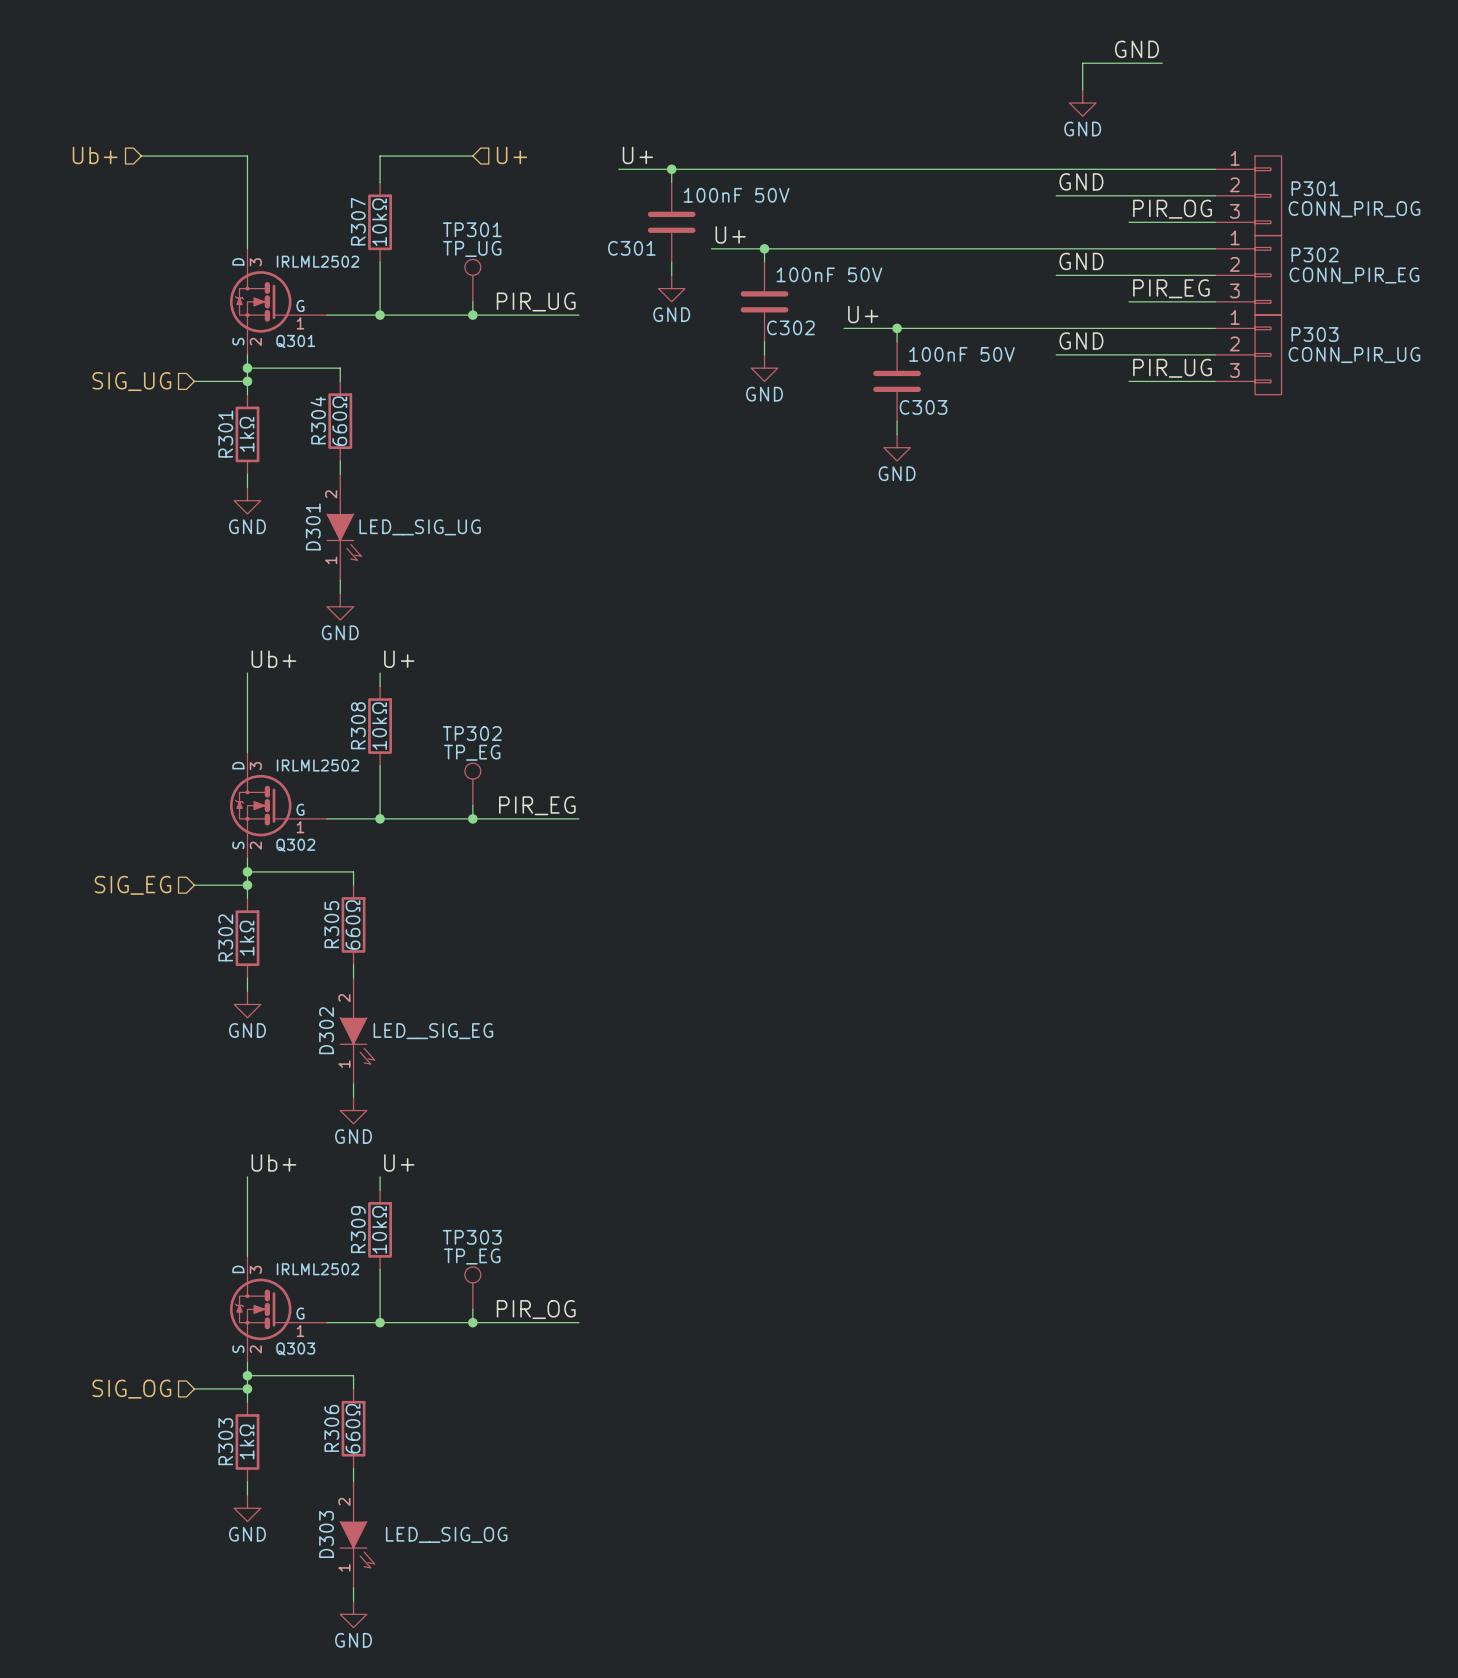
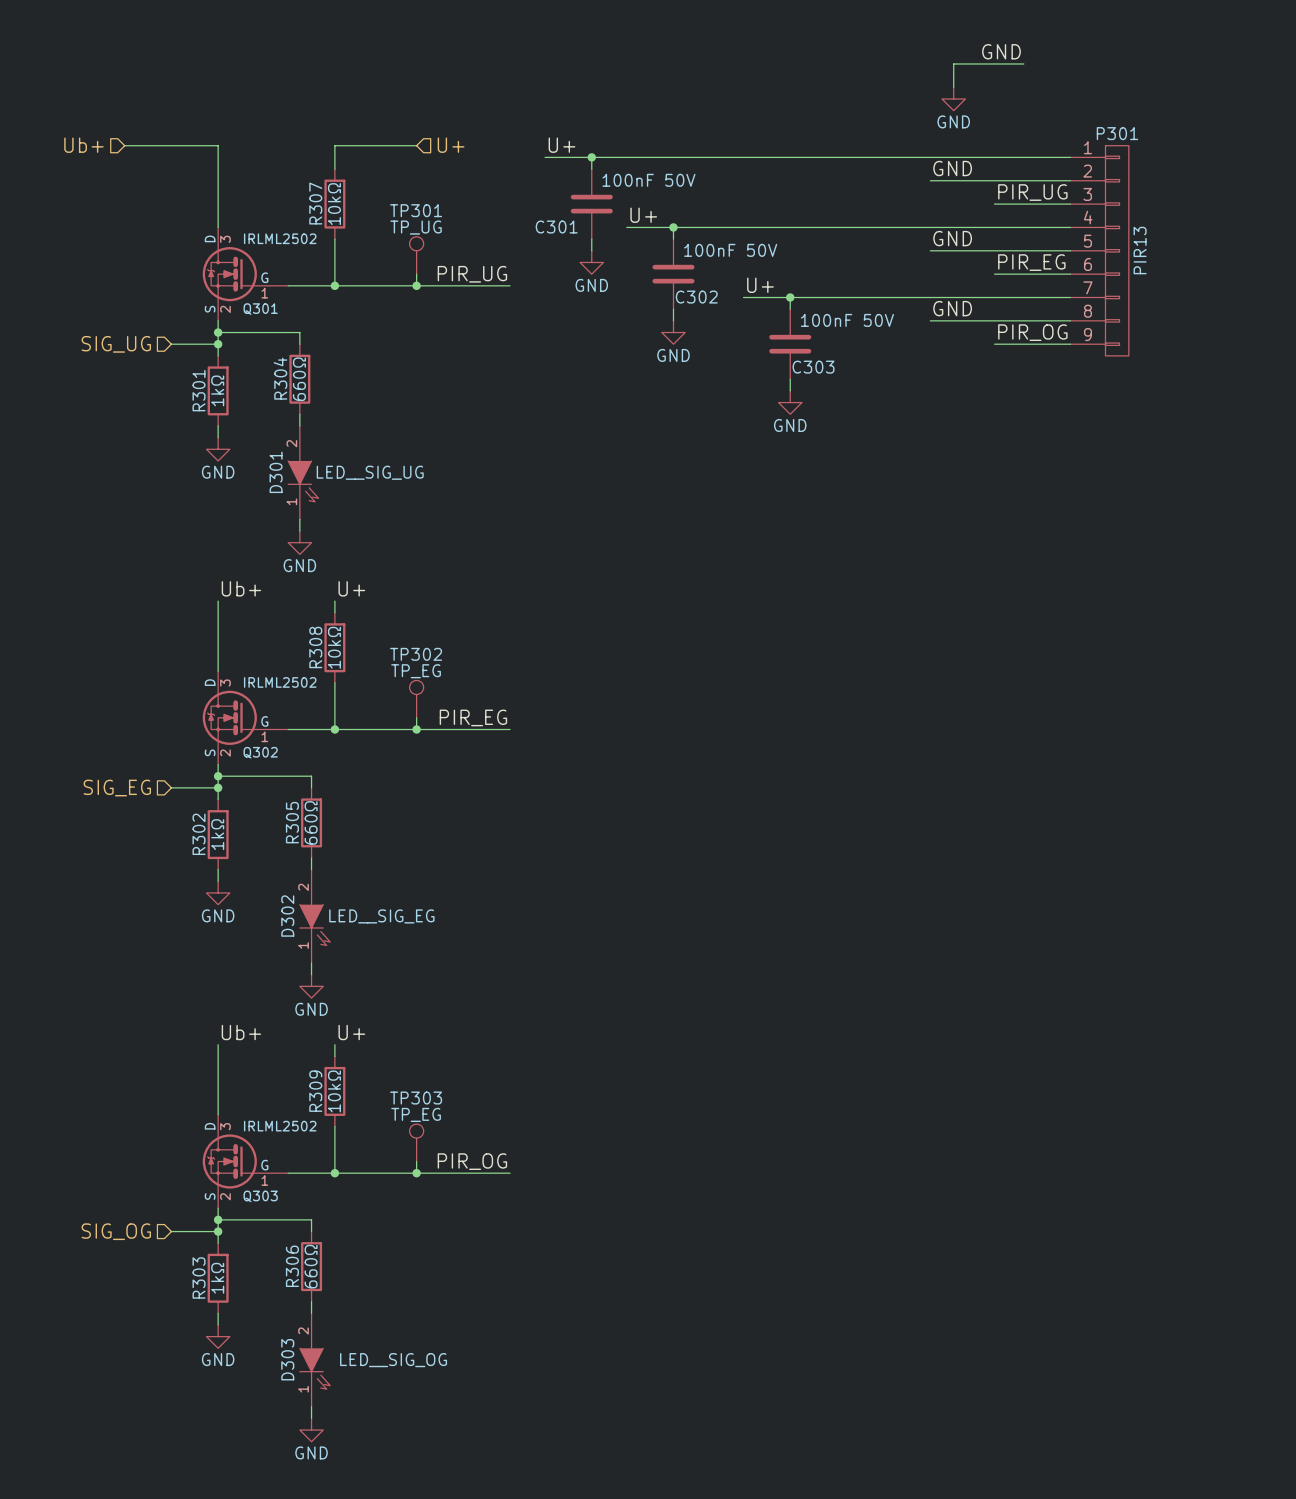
P301 symbol: [1215, 156, 1282, 236] -> [1070, 145, 1129, 356]
P301 name position: P301 (1315, 188) -> P301 (1117, 133)
label: PIR_OG (1172, 209) -> PIR_UG (1032, 192)
P301 value: CONN_PIR_OG (1354, 209) -> PIR13 (1140, 250)
P302: CONN_PIR_EG (1248, 275) -> none
P303: CONN_PIR_UG (1248, 354) -> none
label: PIR_UG (1172, 368) -> PIR_OG (1032, 332)

